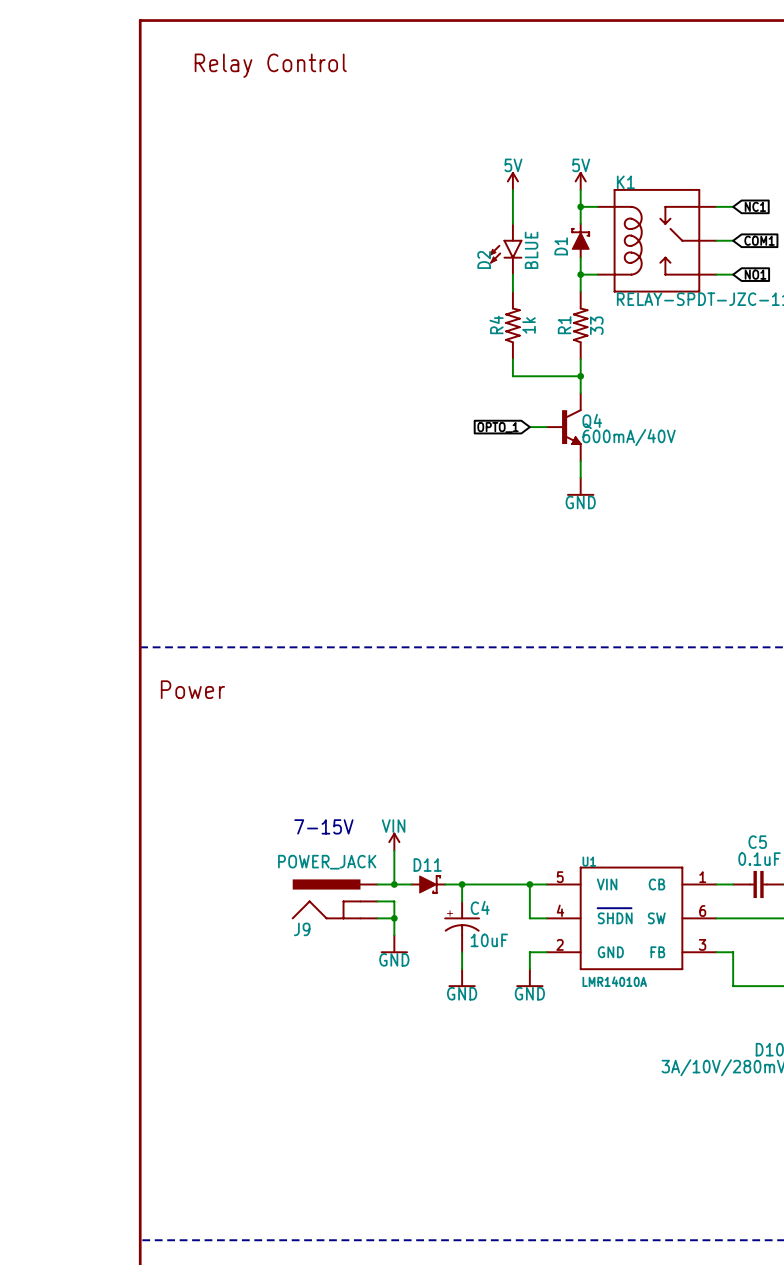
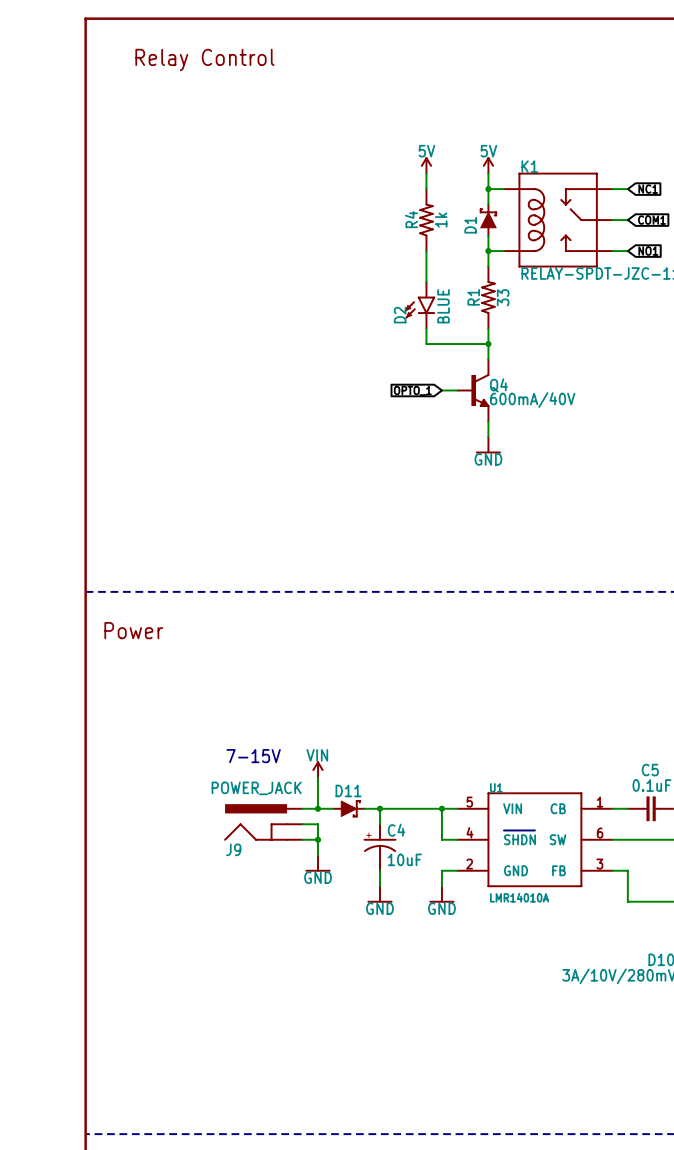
D2 position: (505, 249) -> (420, 305)
R4 position: (512, 325) -> (426, 220)

